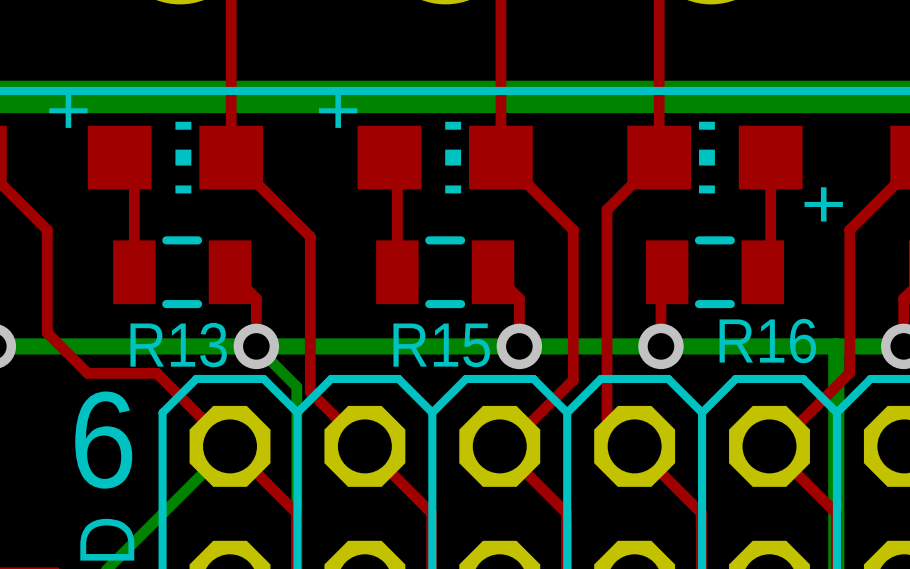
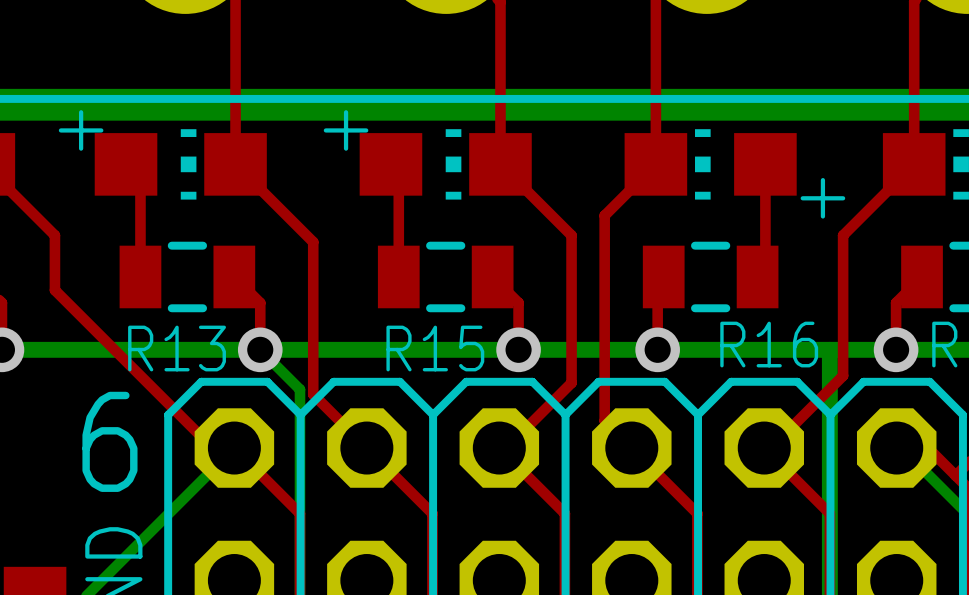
top track: (47, 285) (47, 332) (87, 373) (157, 373) (230, 446) -> (54, 290) (212, 448) (234, 448)

